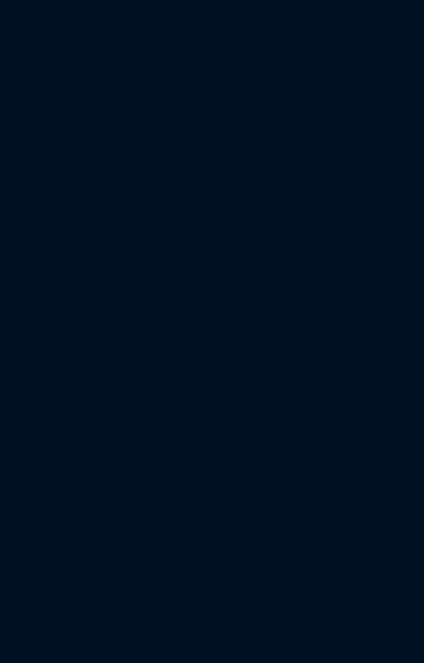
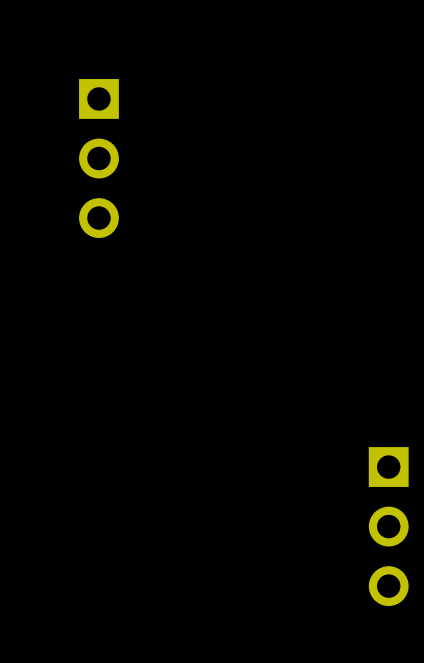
part: none -> (98, 158)
part: none -> (388, 526)

